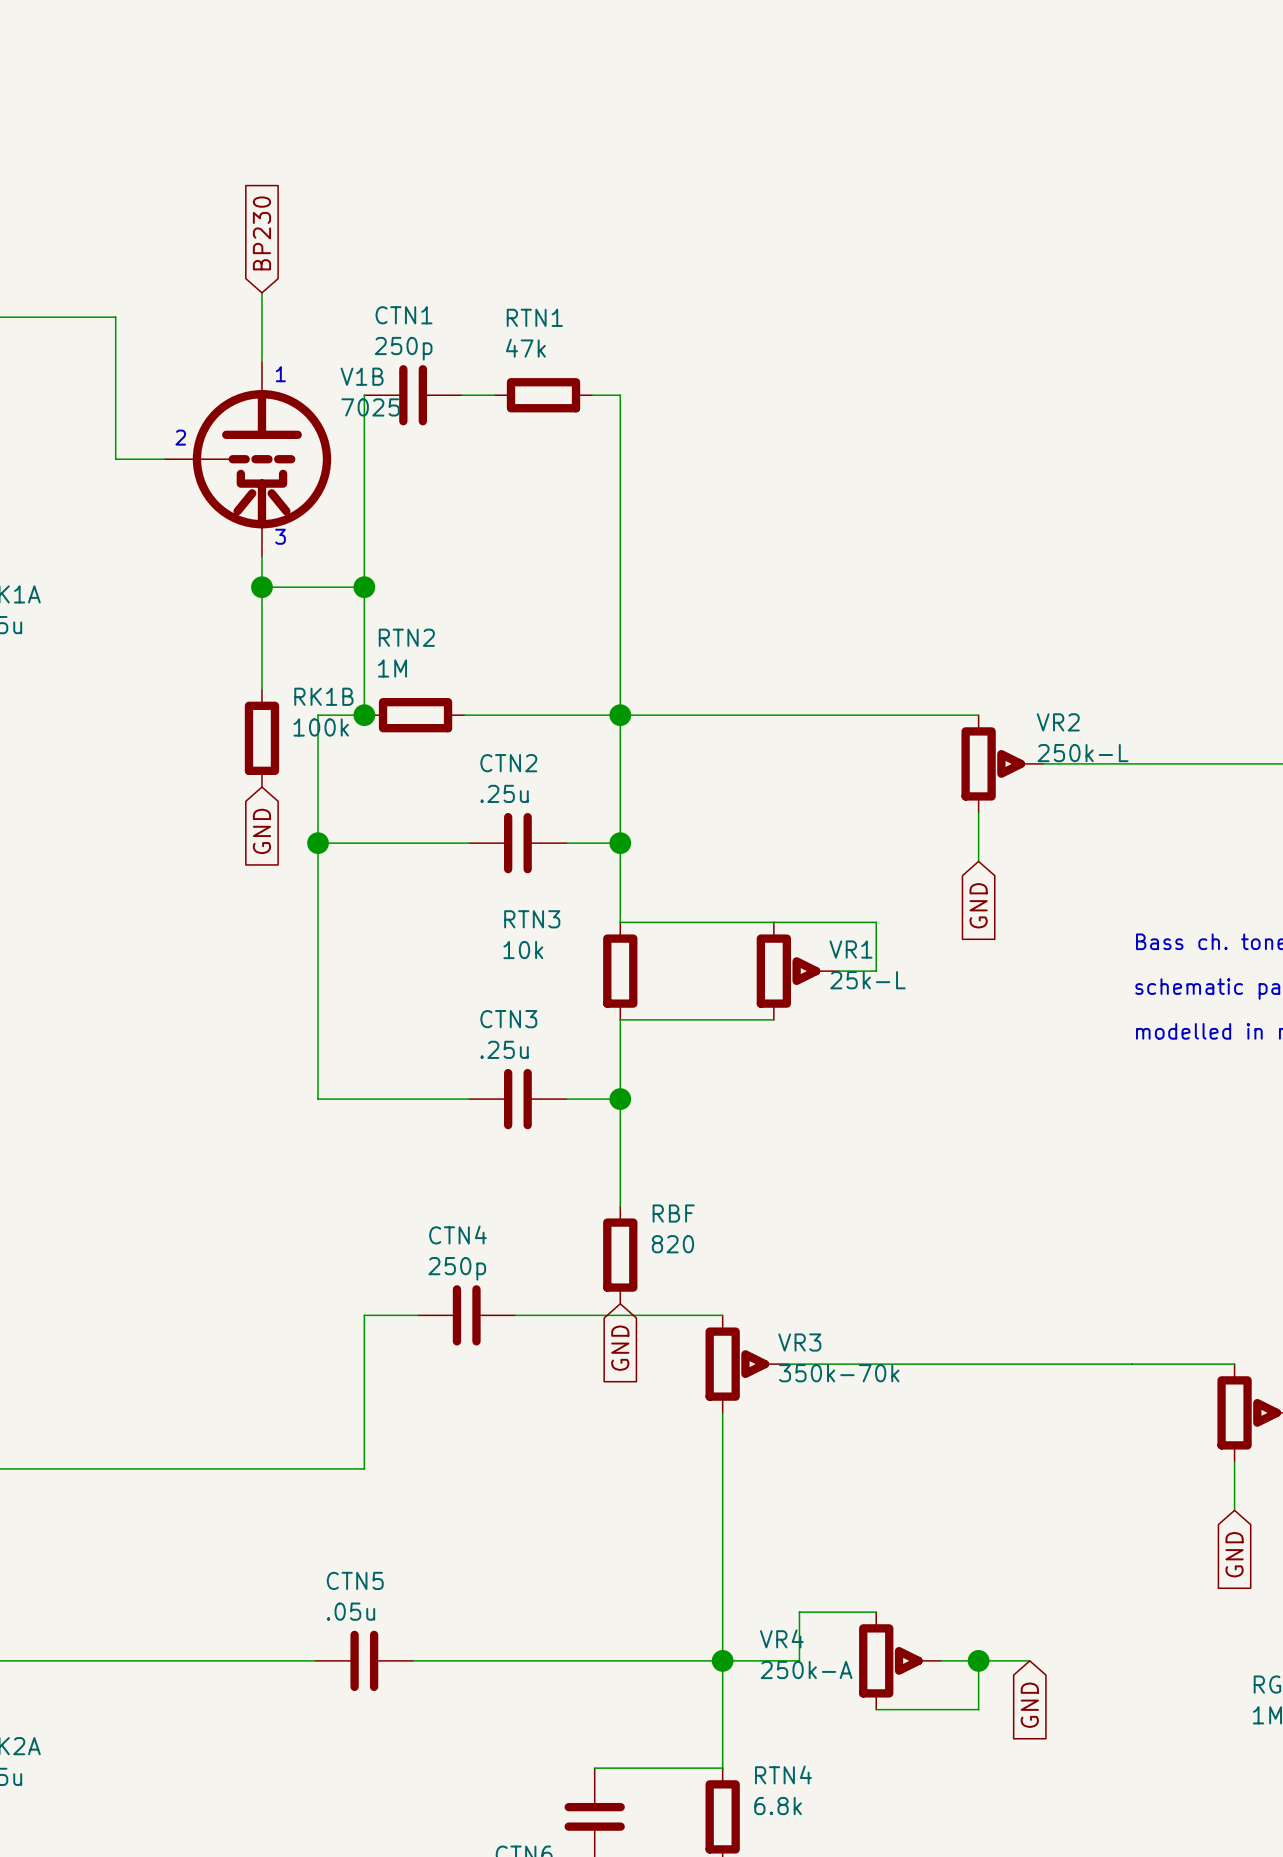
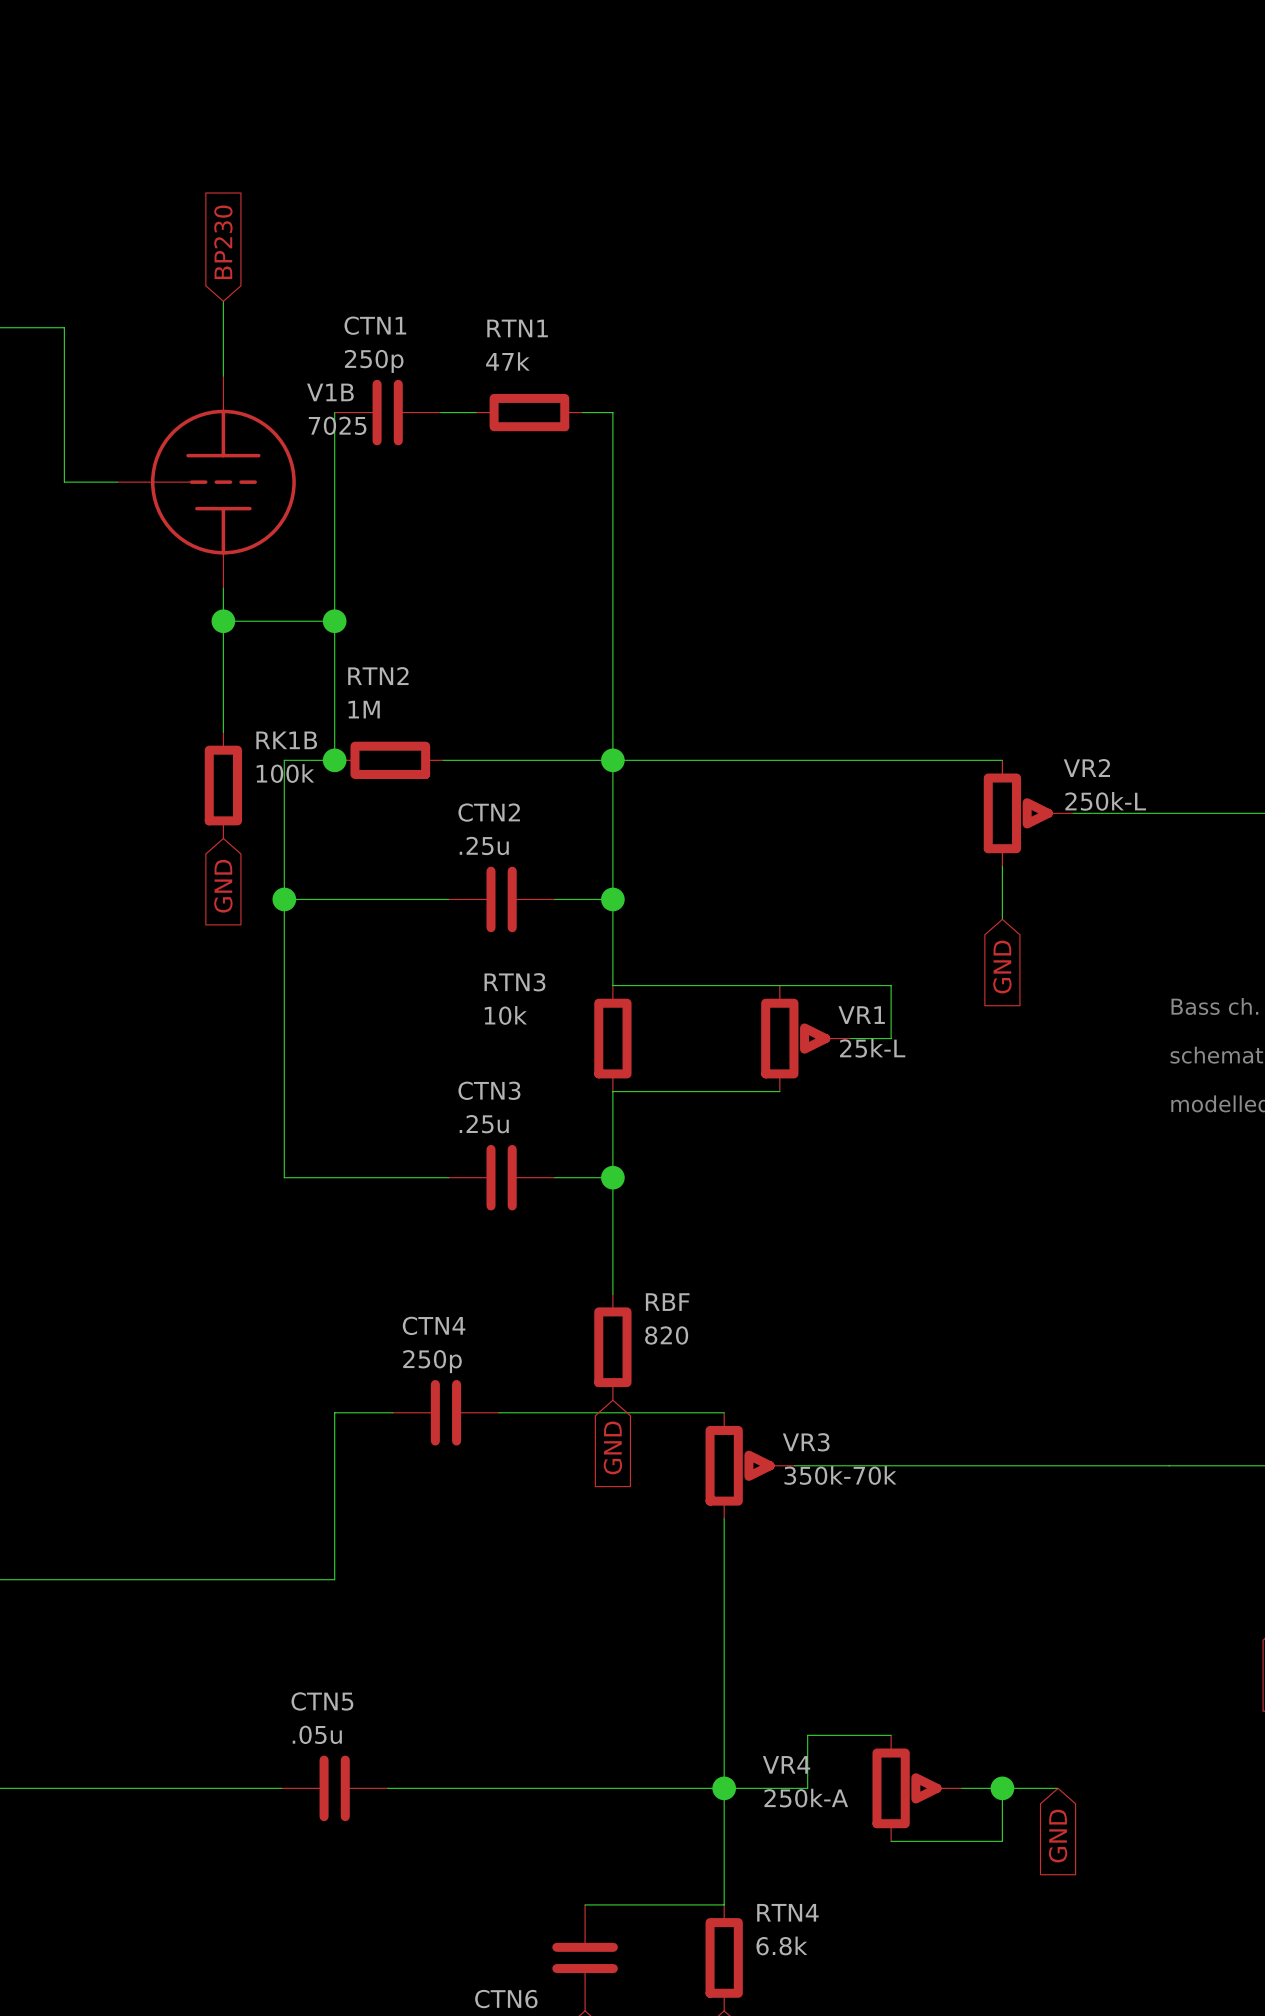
V1B symbol: [164, 361, 332, 557] -> [117, 376, 296, 589]
text: 1 (280, 374) -> none
text: 2 (180, 437) -> none
text: 3 (280, 536) -> none

